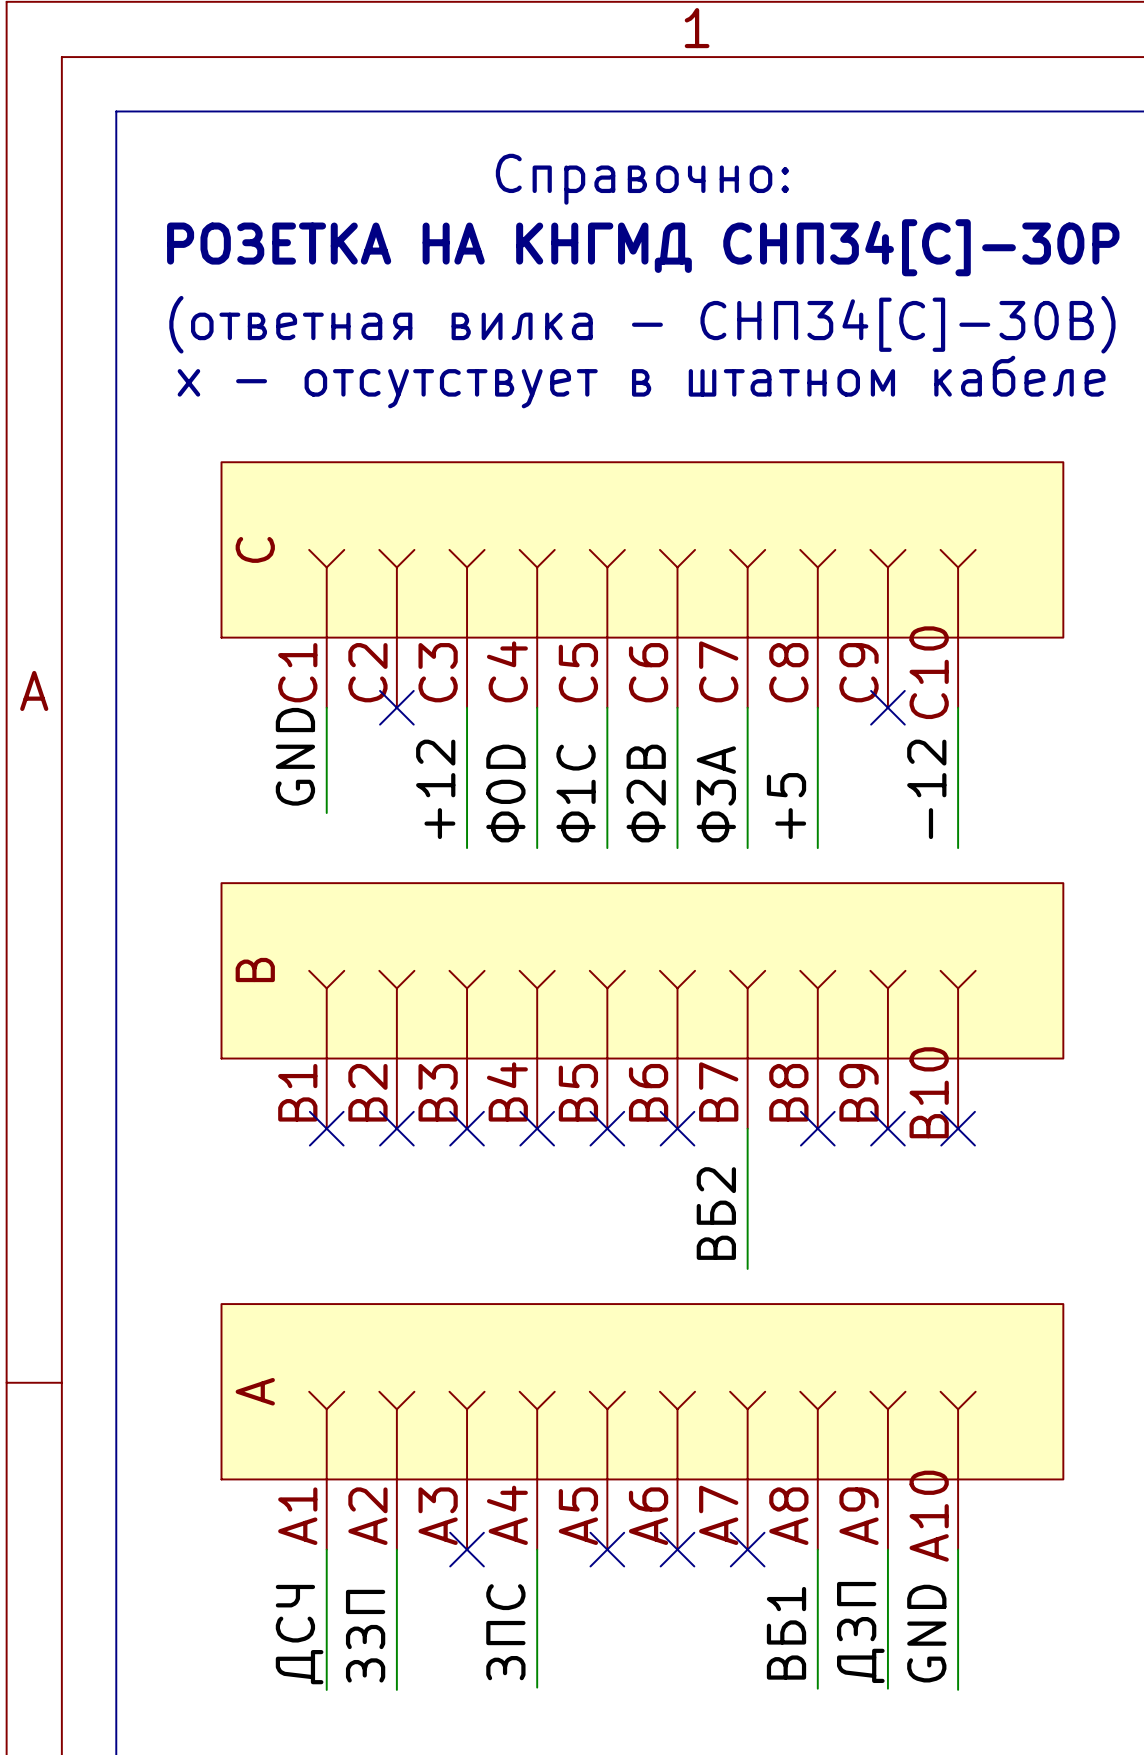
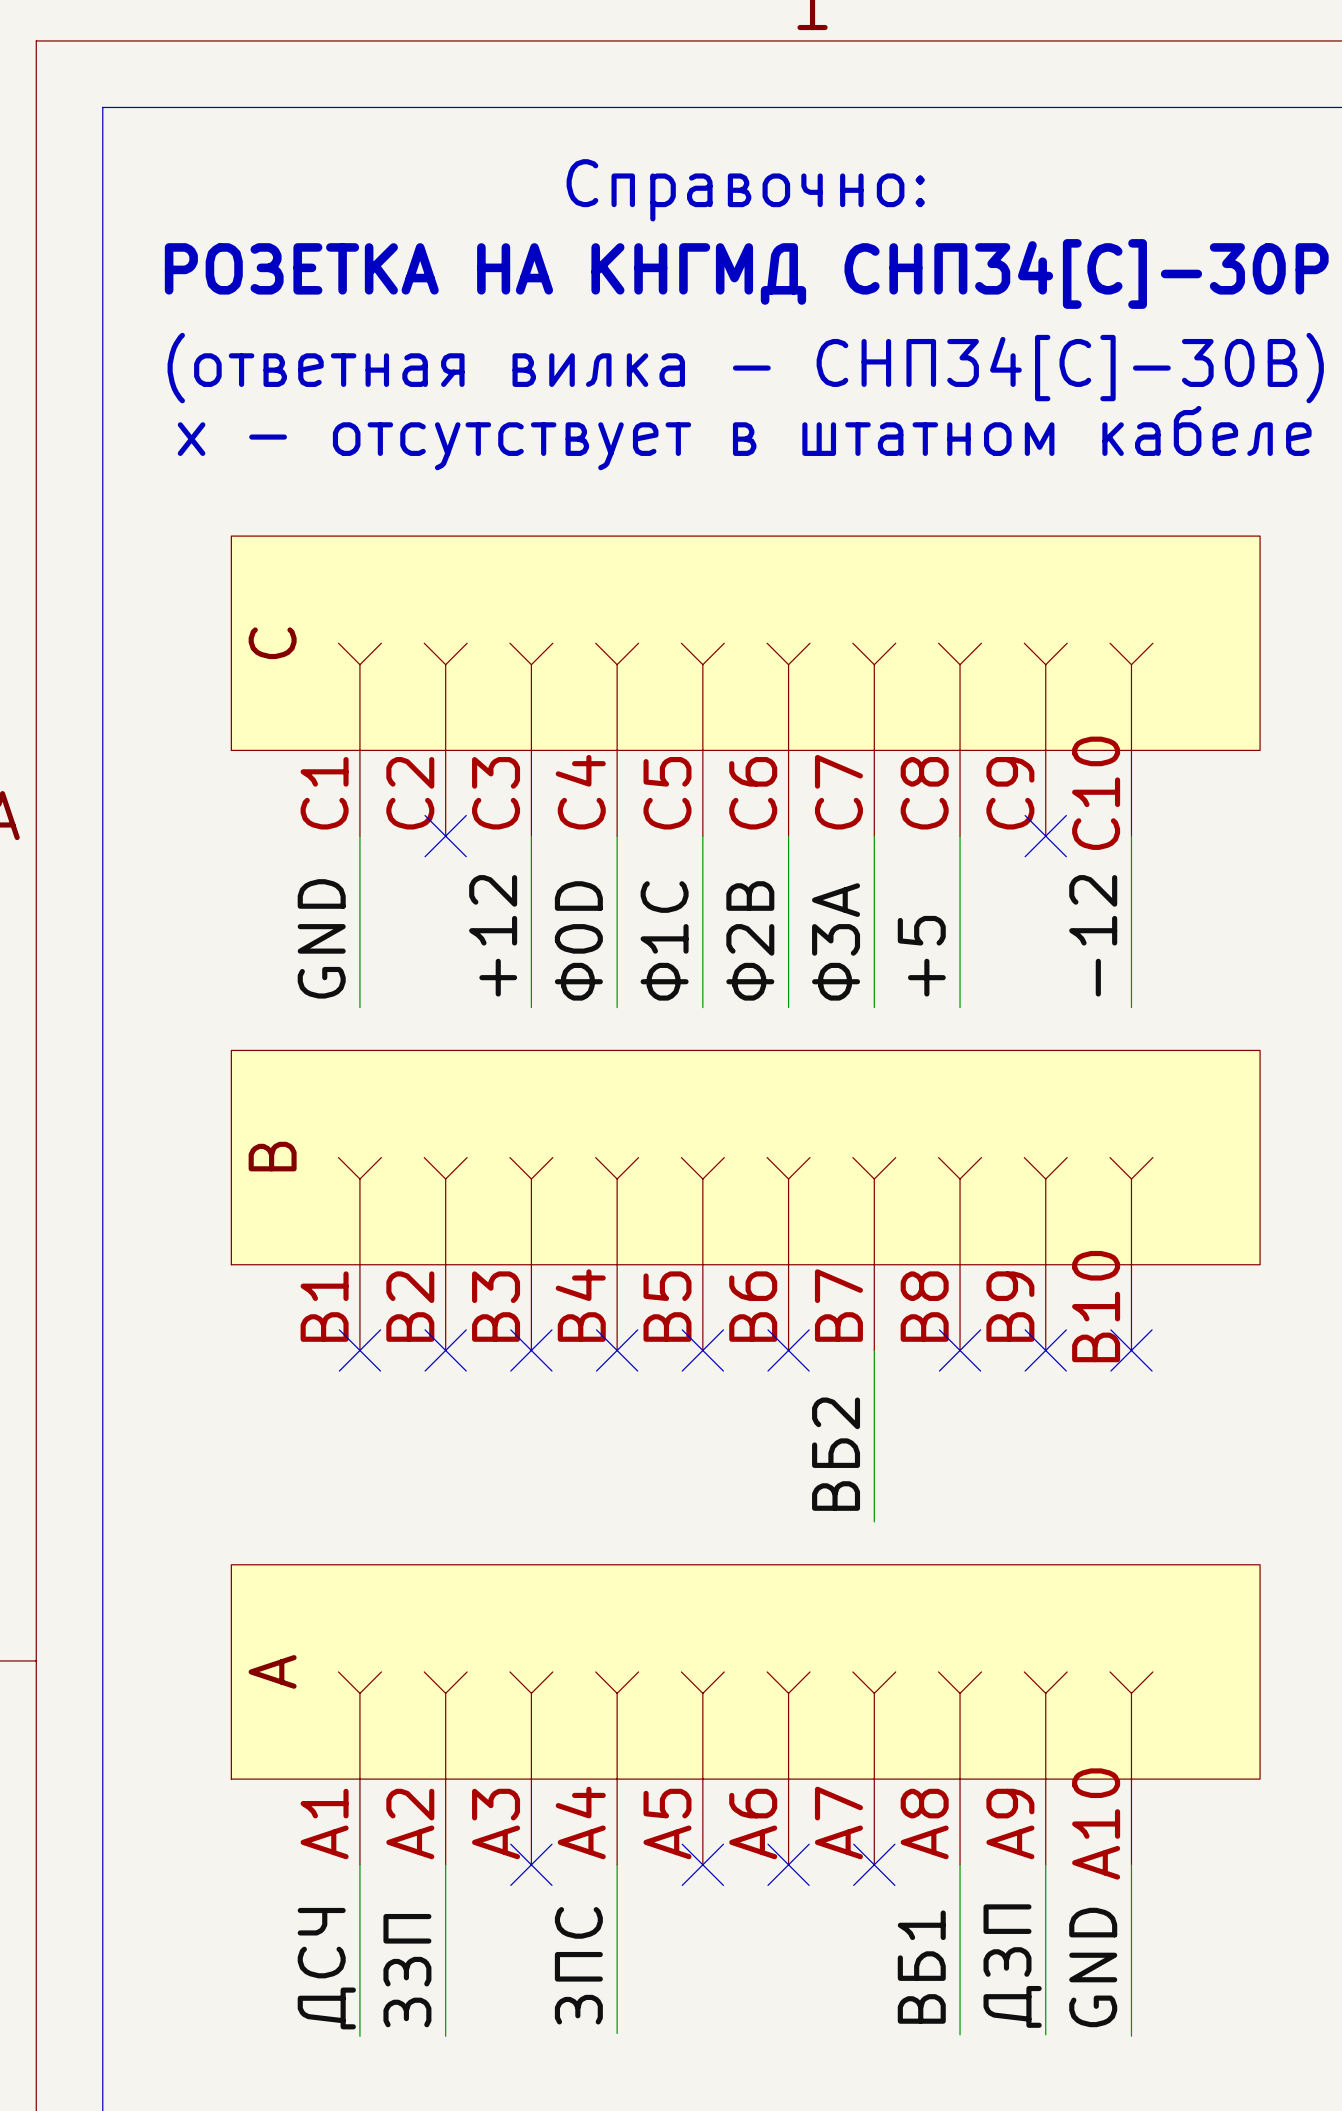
label position: GND (295, 756) -> GND (321, 938)
wire: none -> (359, 964) (359, 1007)

